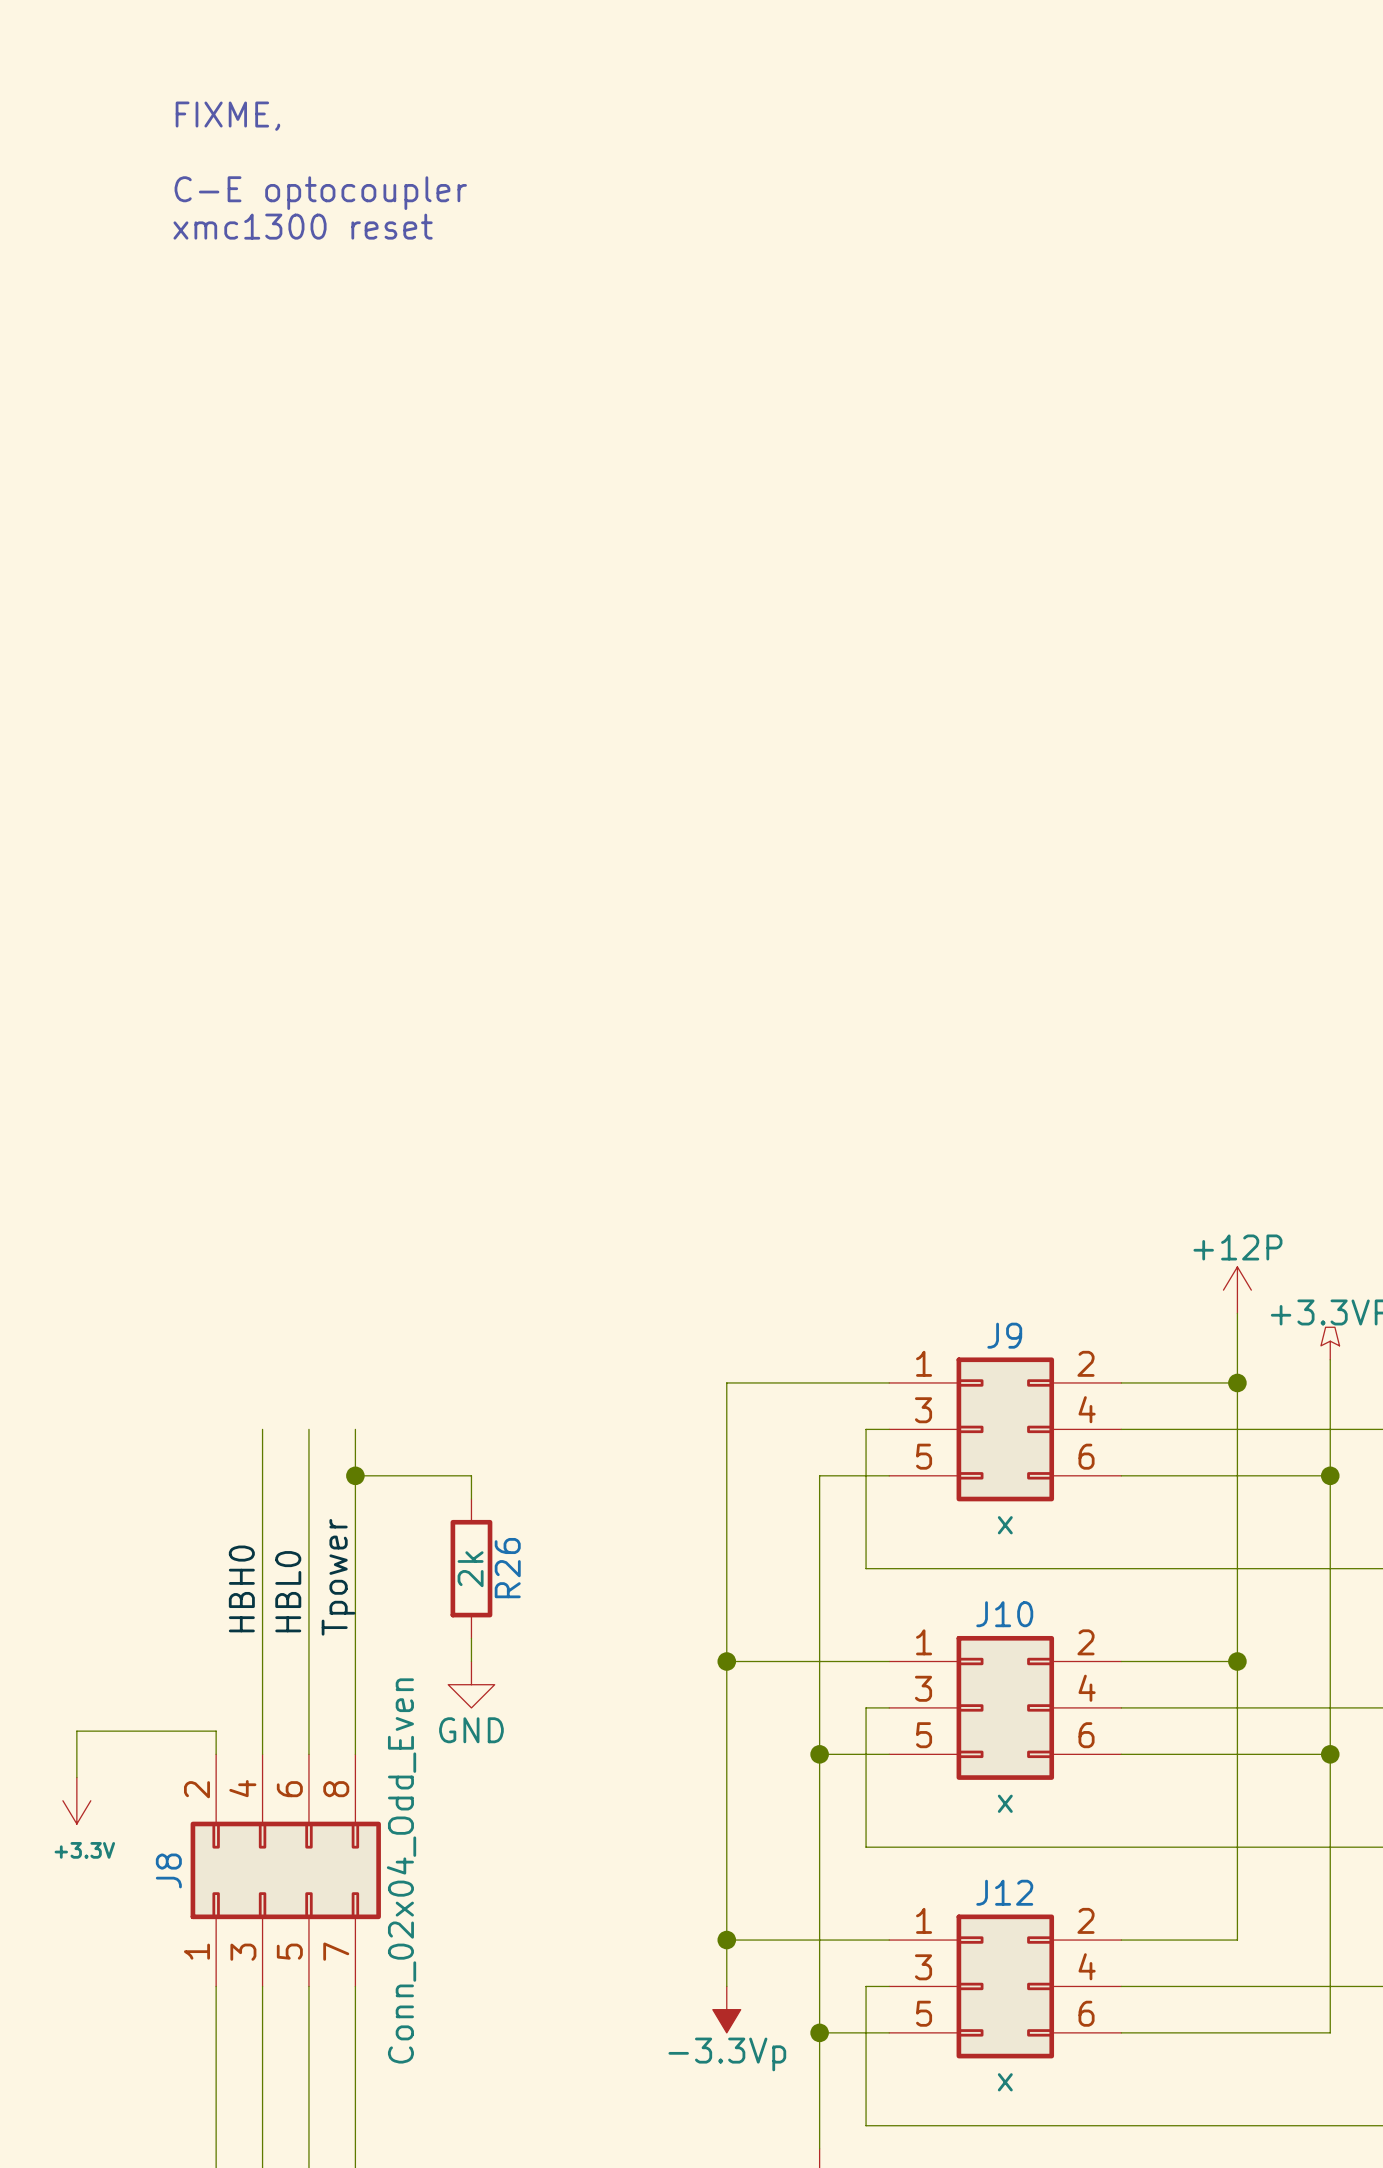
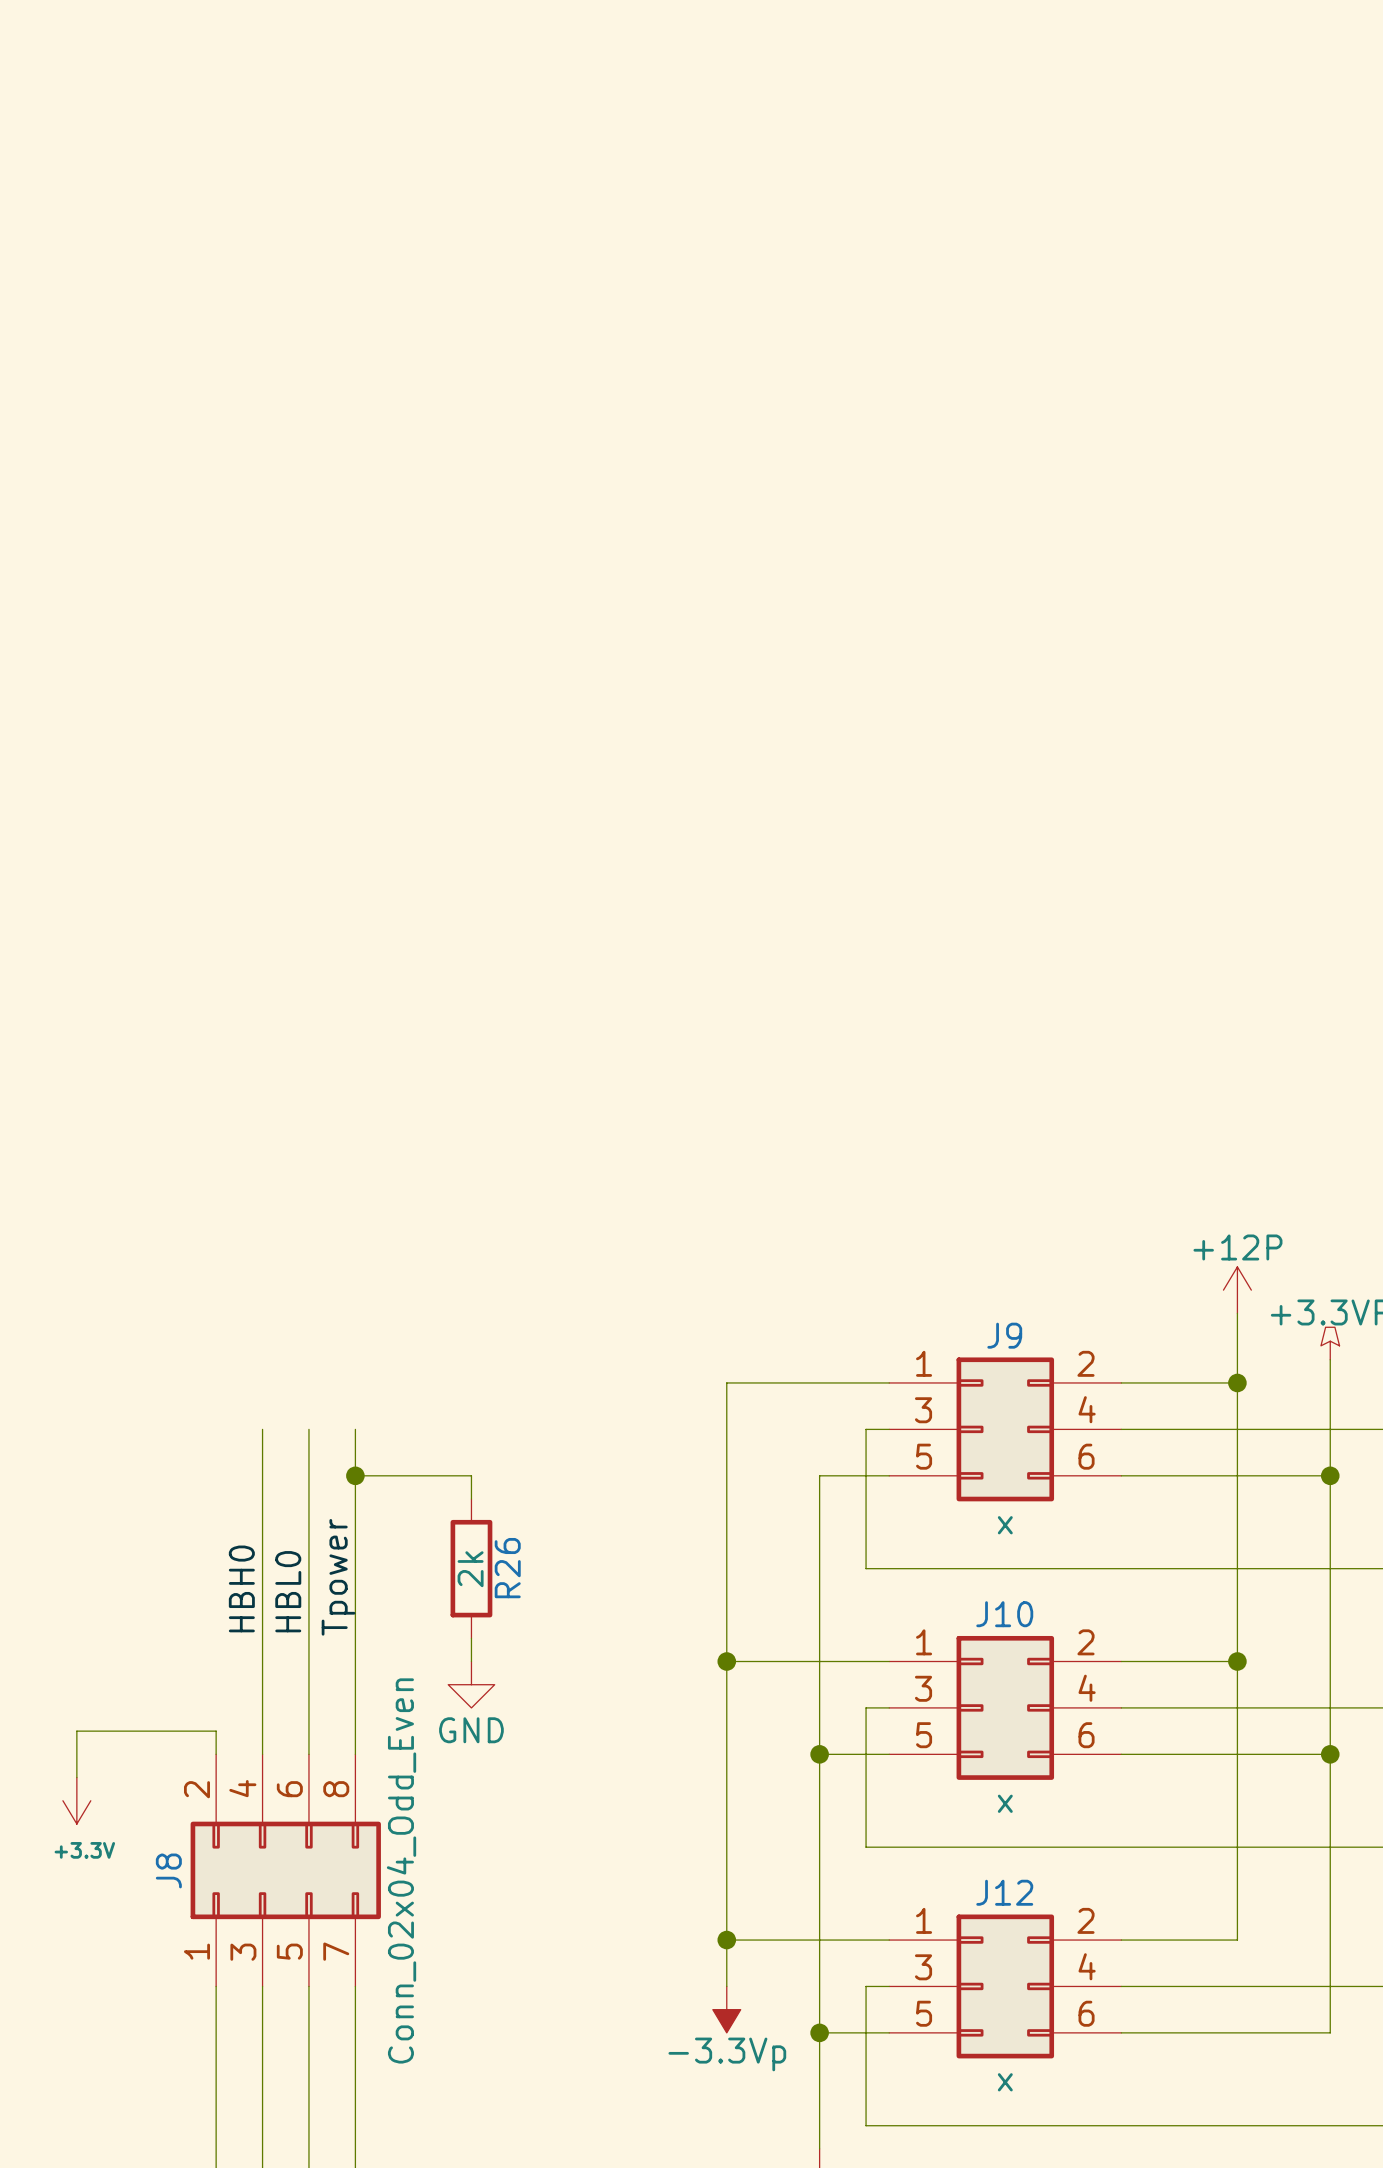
text: FIXME, (227, 116) -> none
text: C-E optocoupler (320, 193) -> none
text: xmc1300 reset (303, 226) -> none

